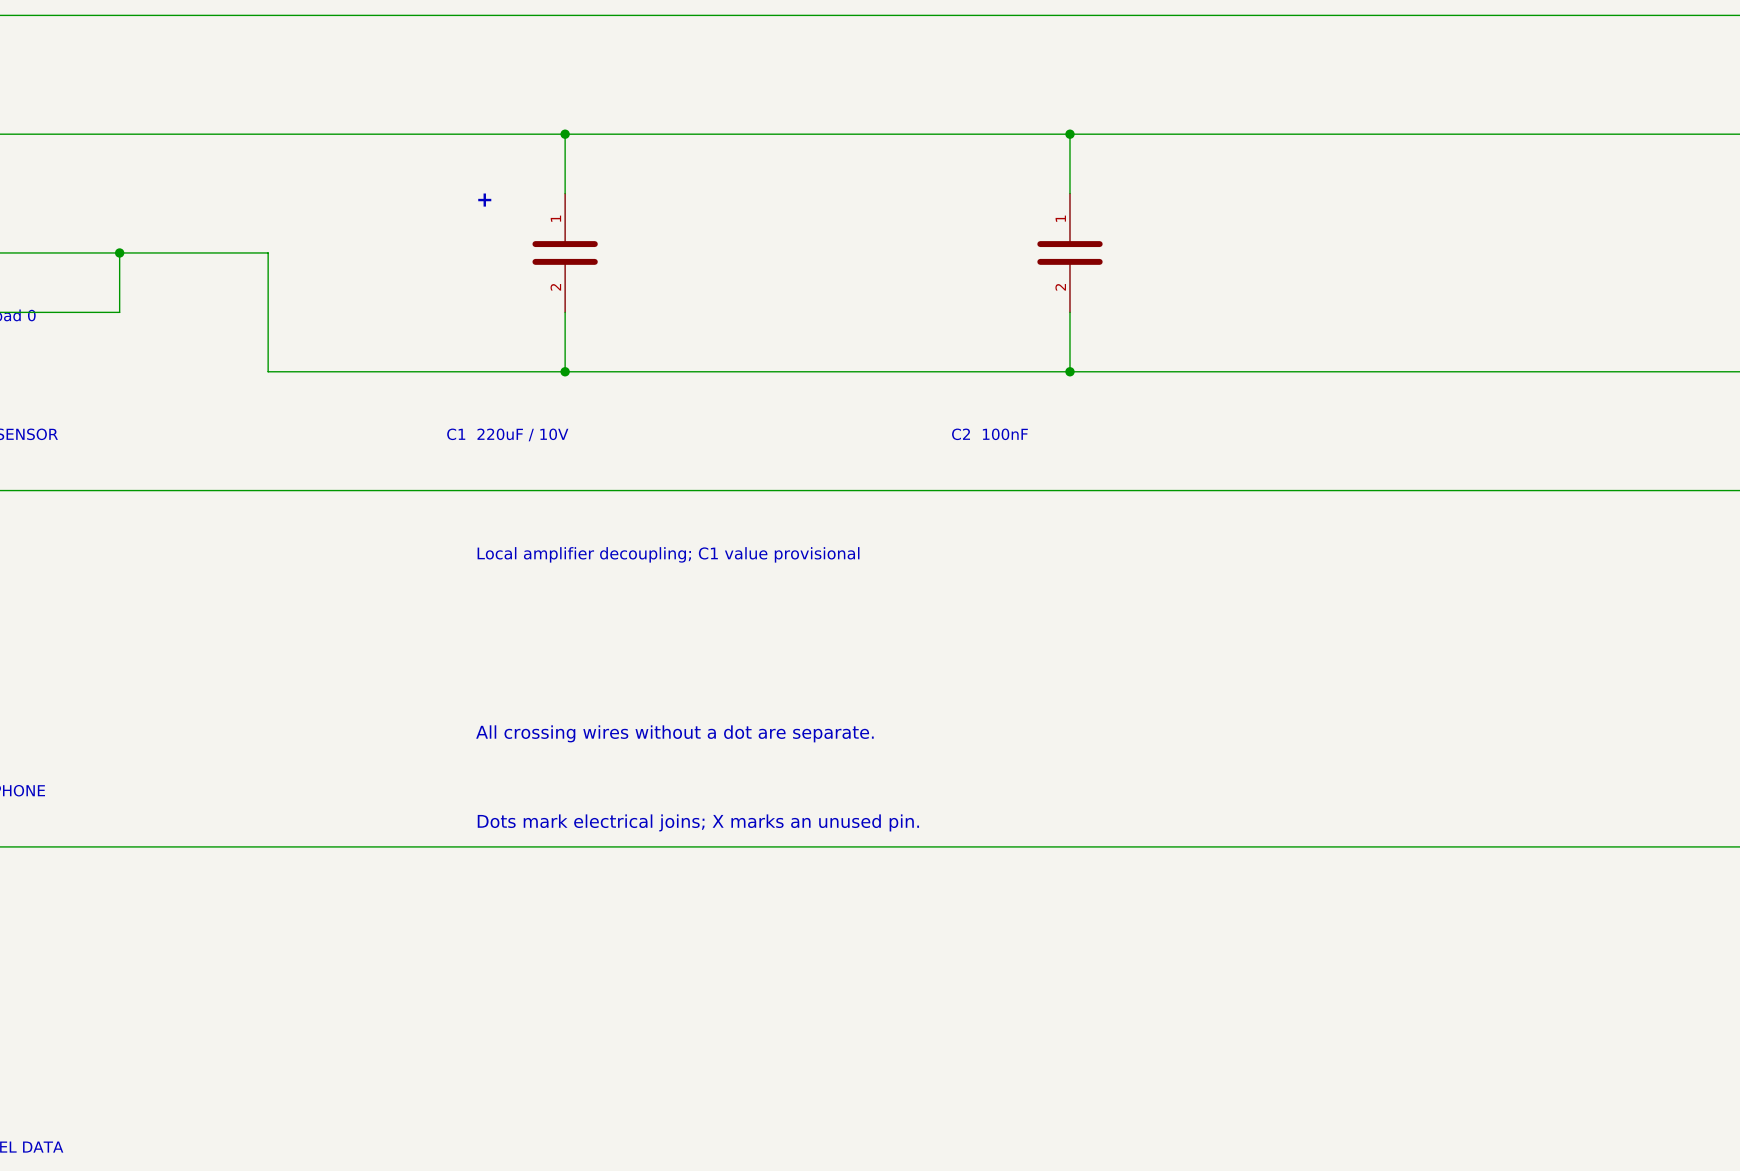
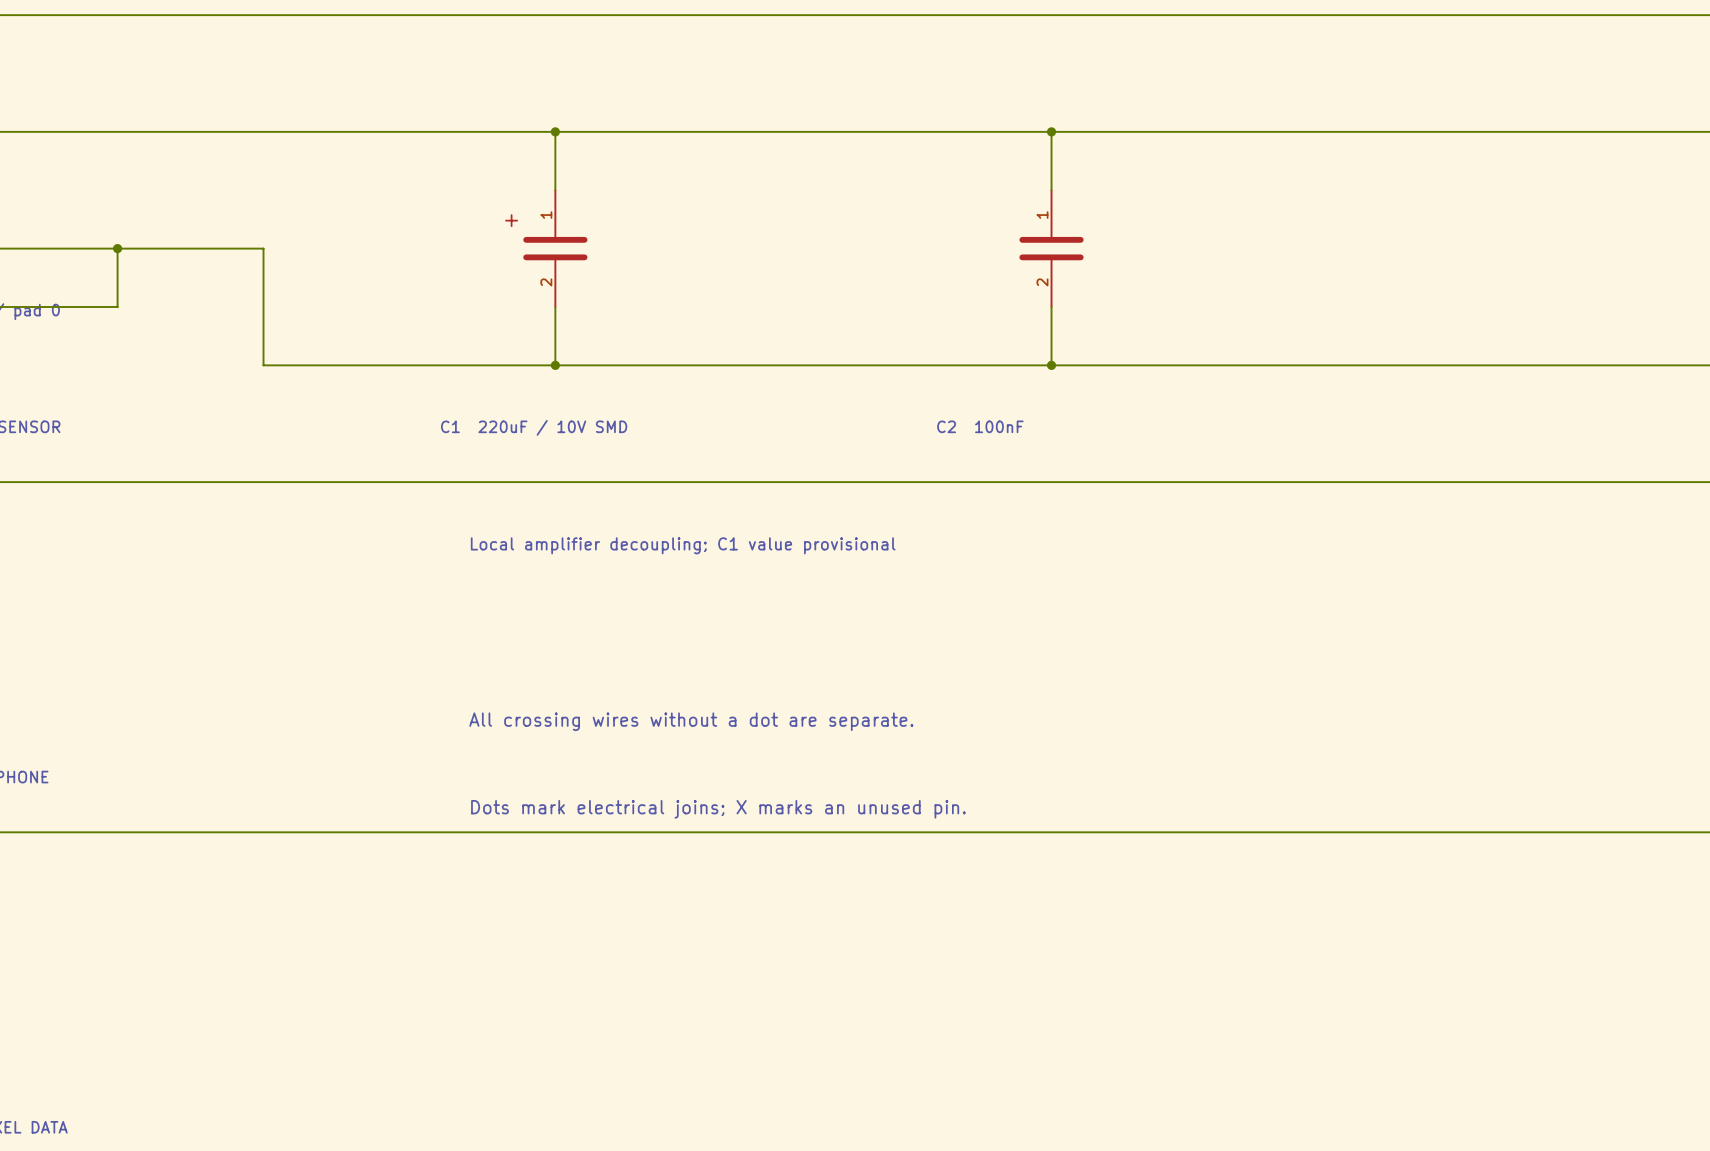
text: + (484, 200) -> none
part text: none -> + (511, 220)
text: C1 220uF / 10V (507, 434) -> C1 220uF / 10V SMD (534, 427)

